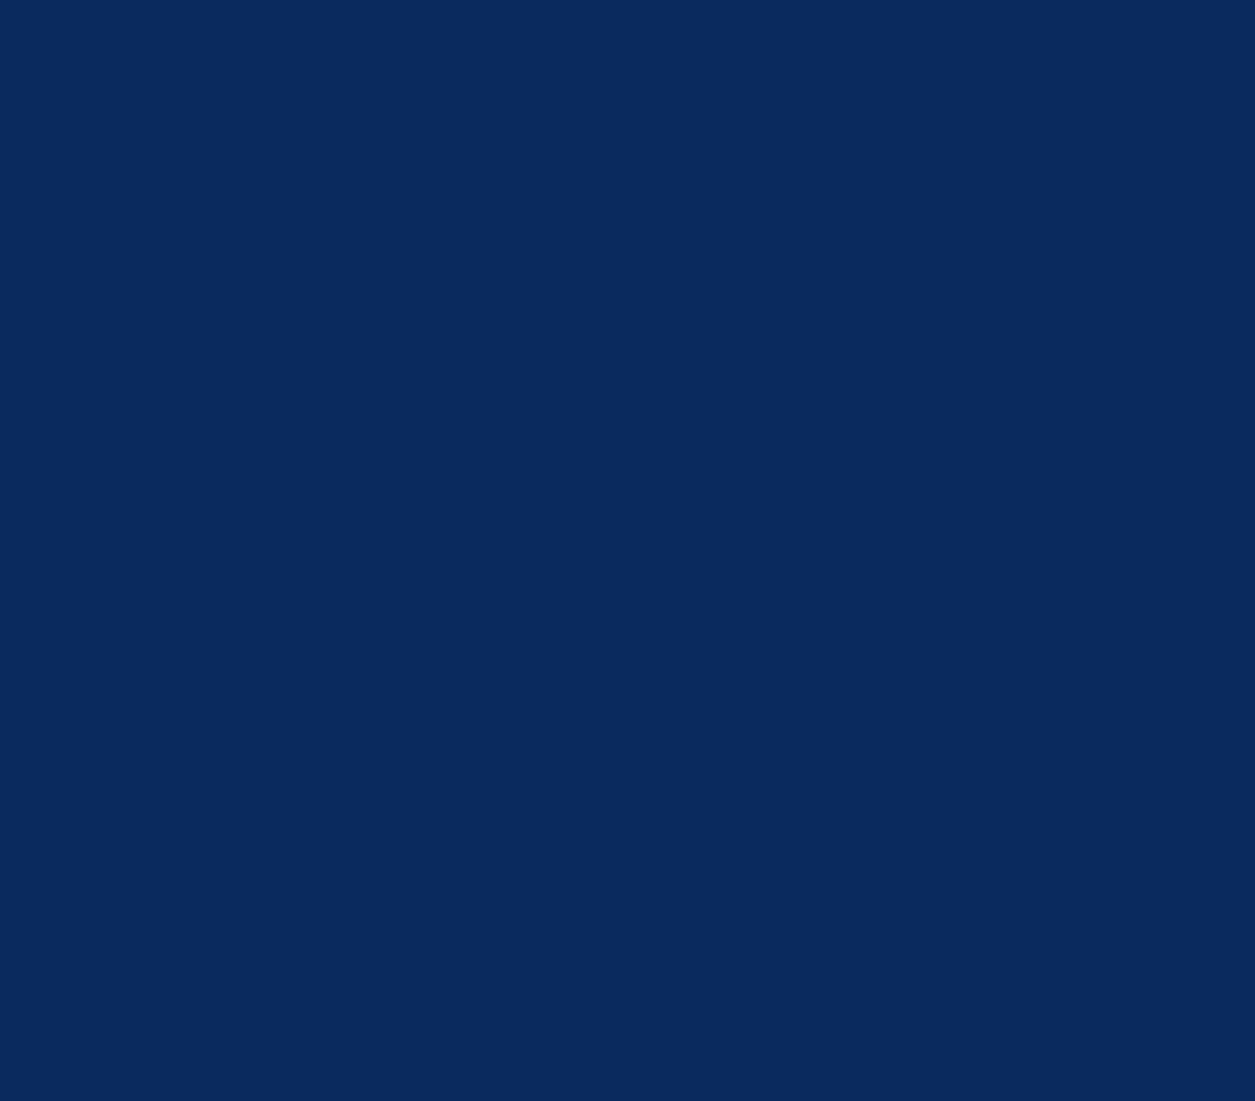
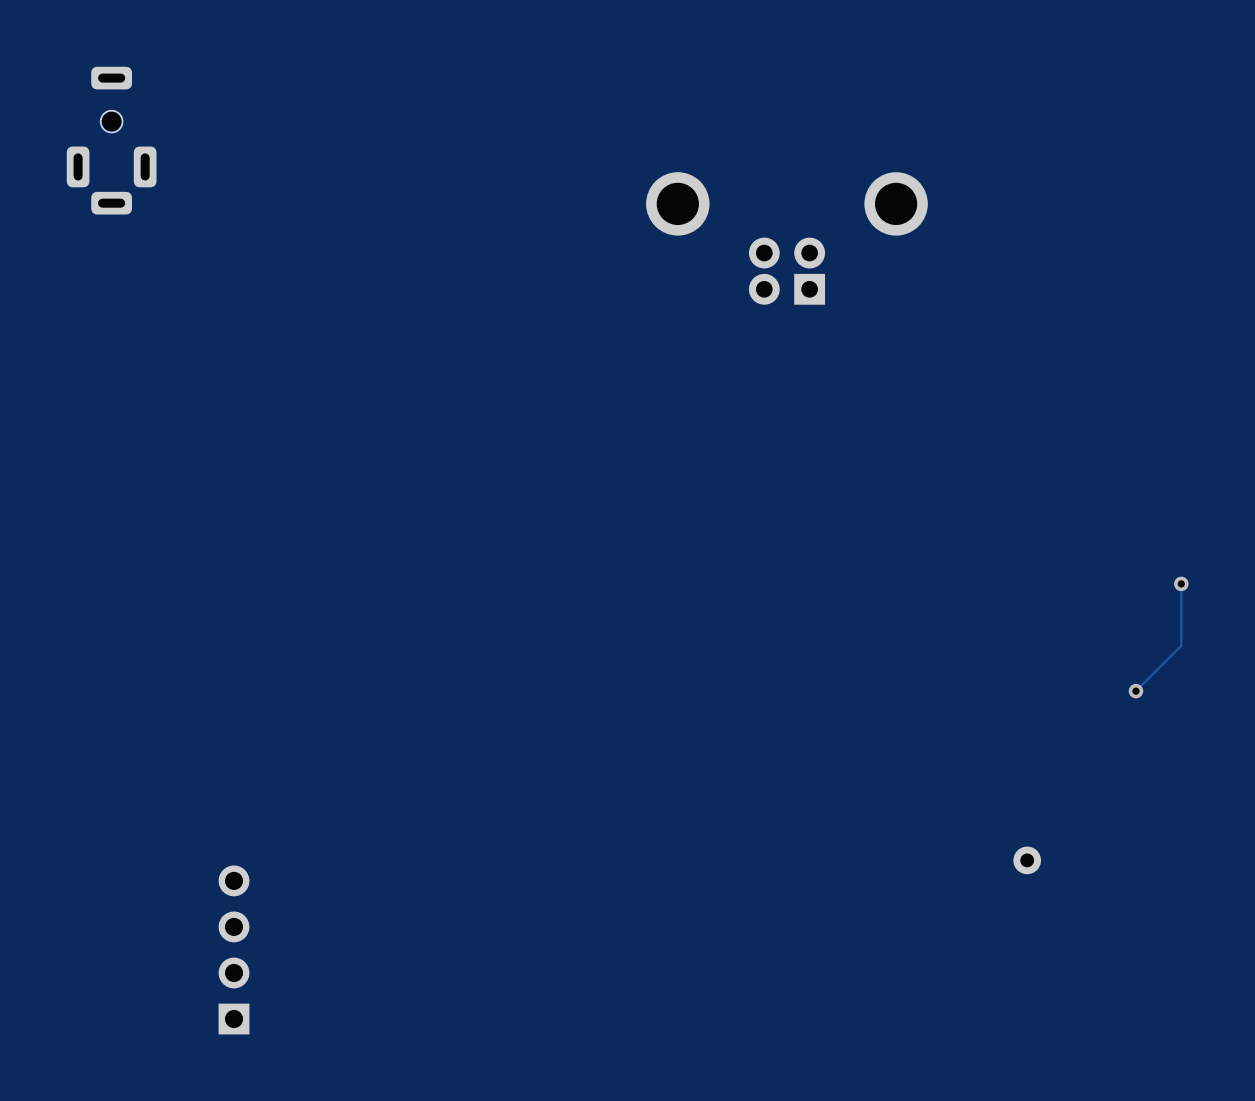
part: none -> (111, 140)
part: none -> (786, 238)
track: none -> (1181, 583) (1181, 645) (1135, 691)
via: none -> (1181, 583)
via: none -> (1135, 691)
part: none -> (1027, 860)
part: none -> (234, 949)

